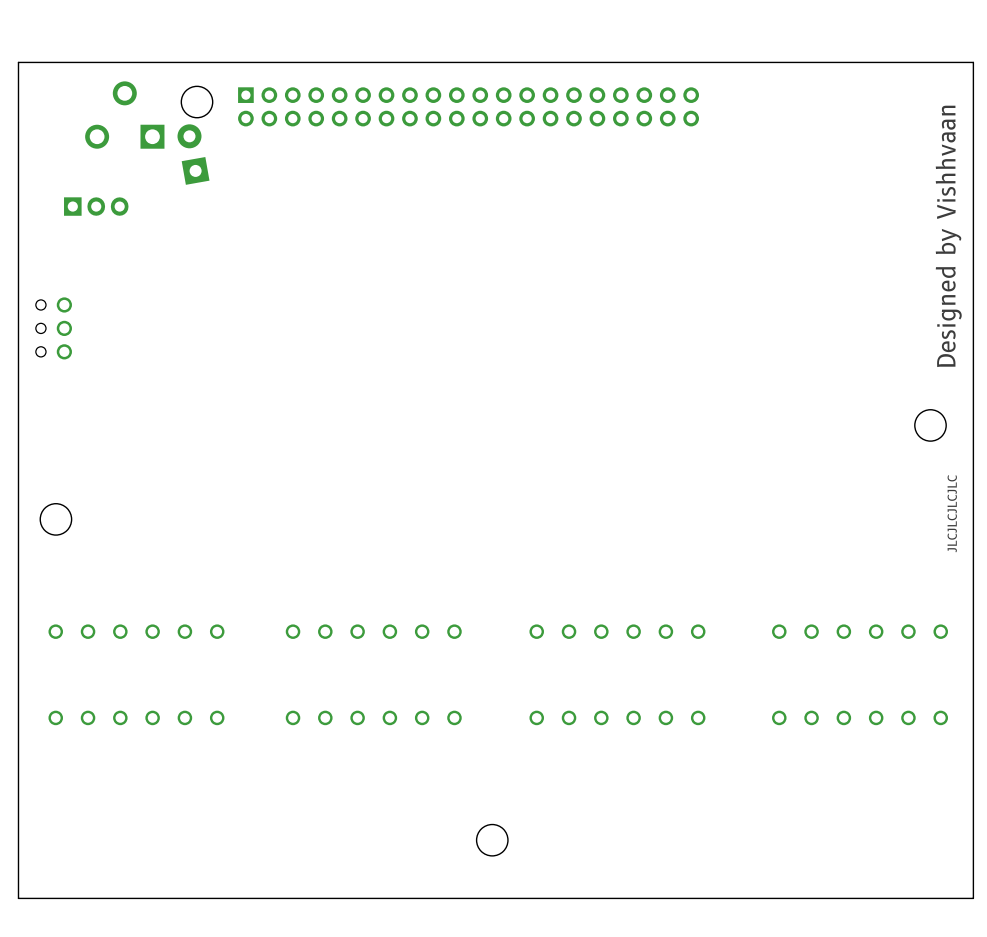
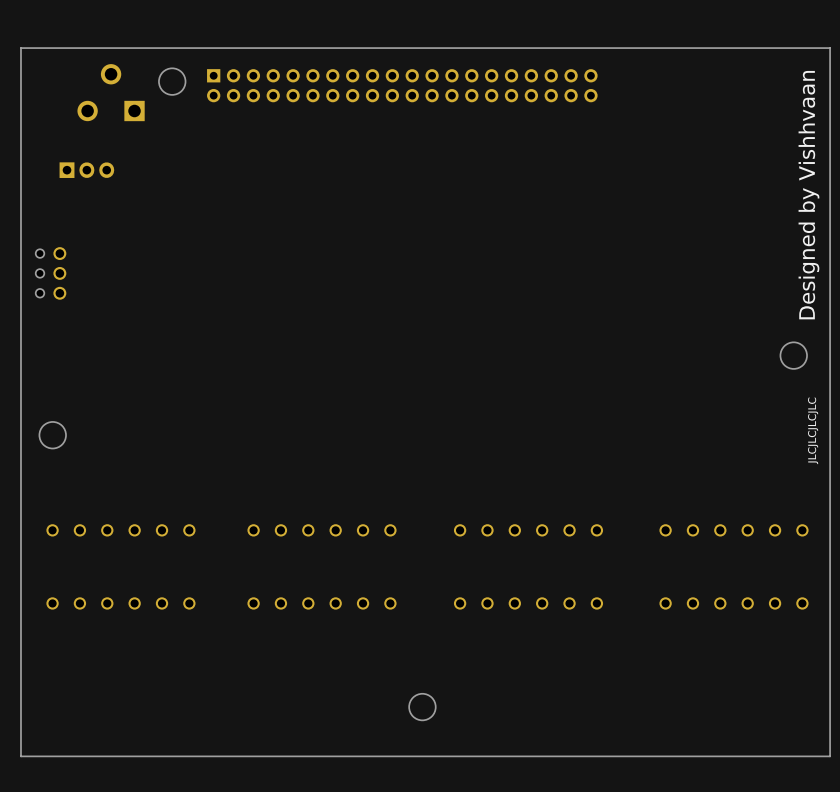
part: (193, 154) -> none

